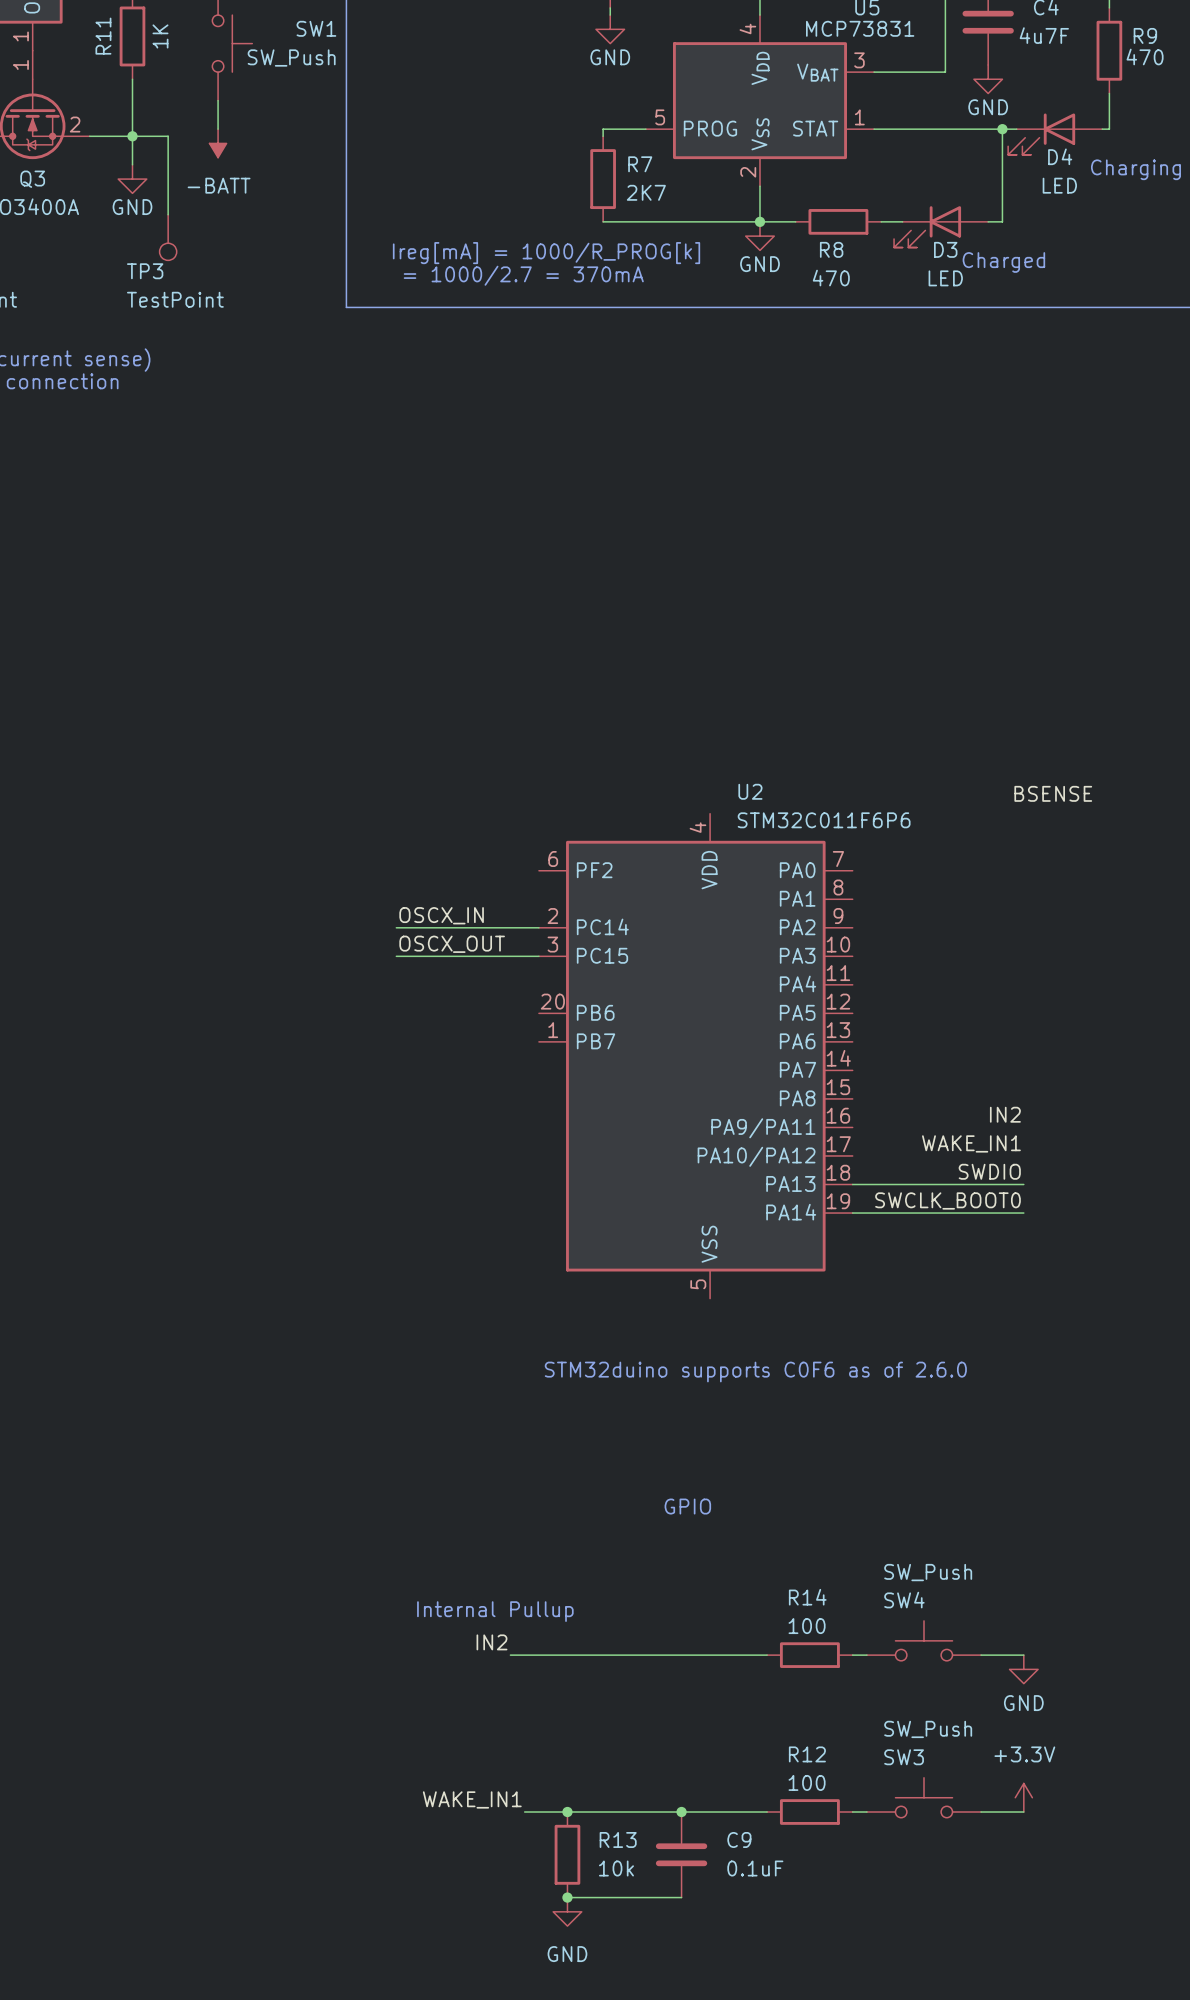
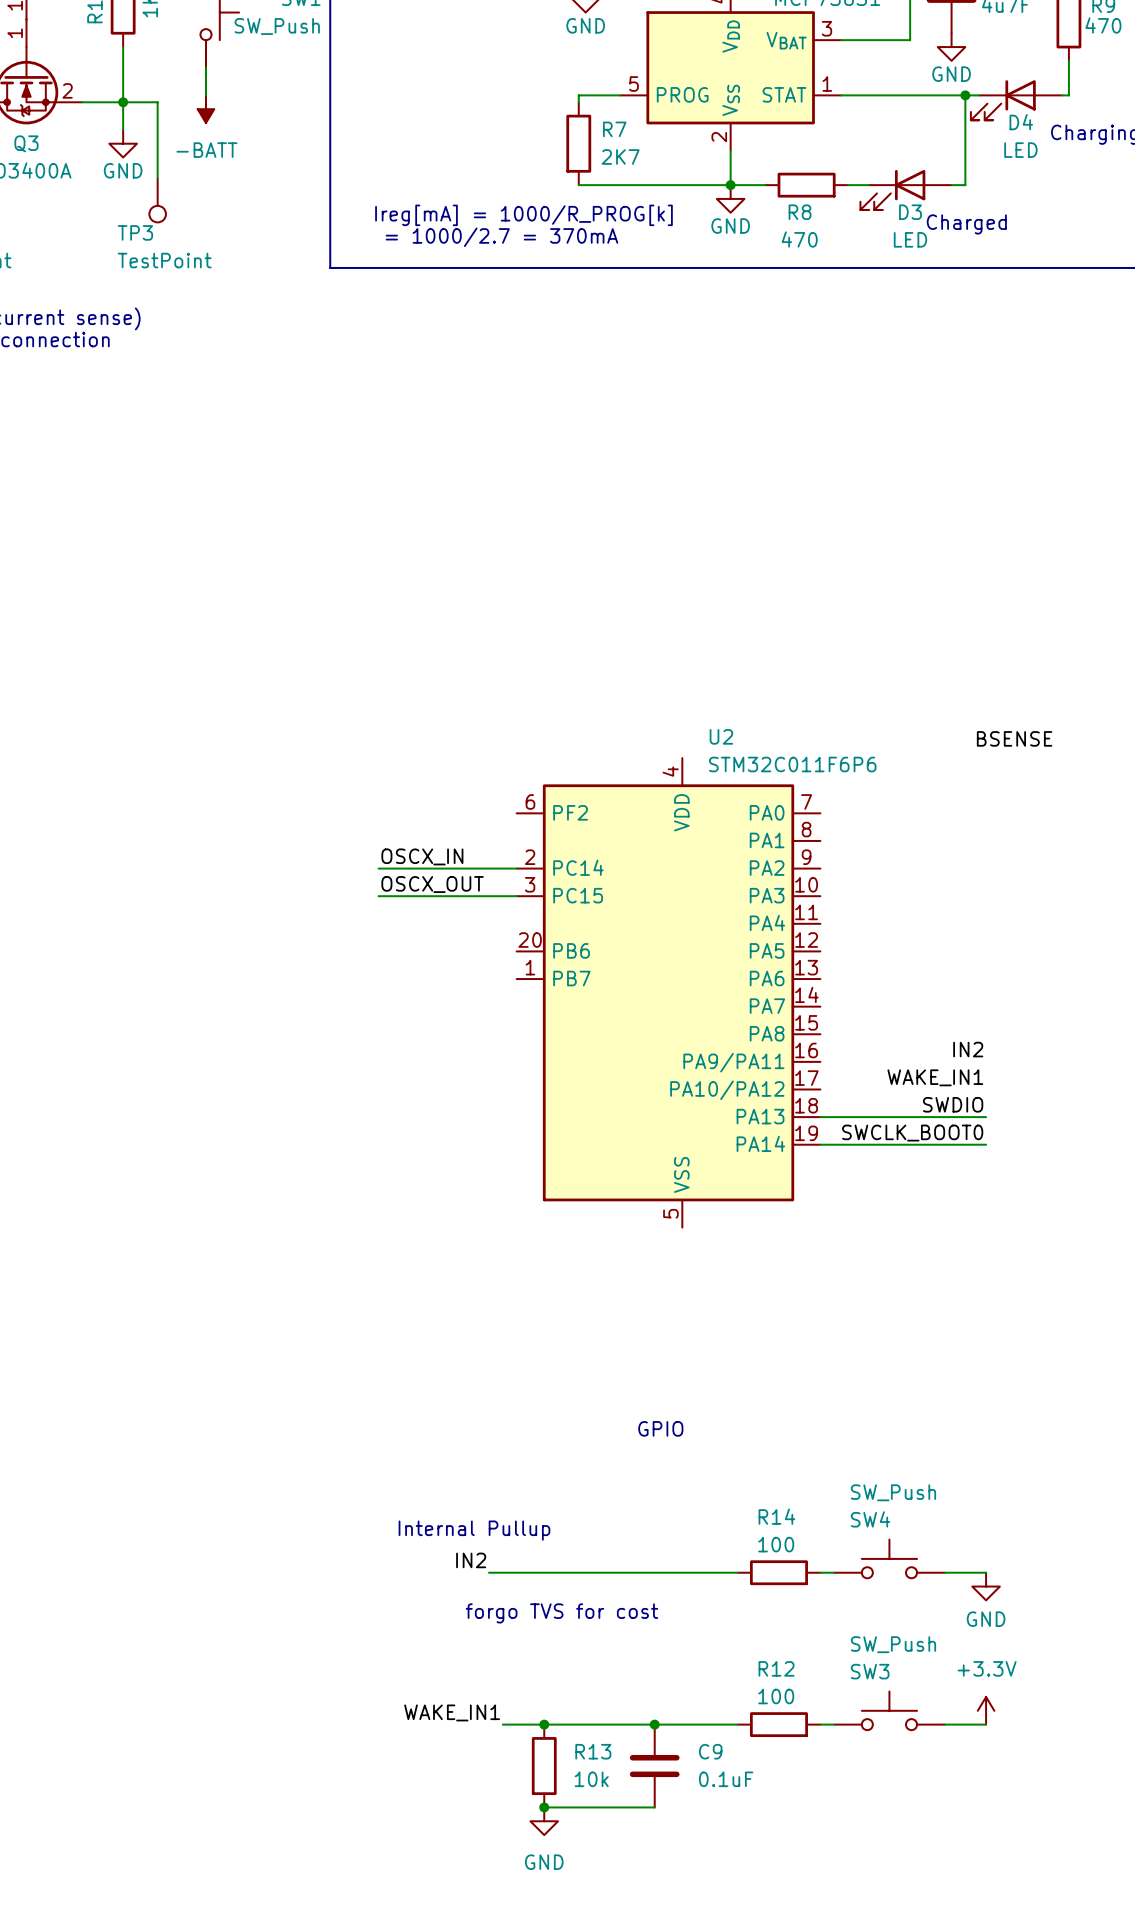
text: STM32duino supports C0F6 as of 2.6.0 (755, 1372) -> none
text: none -> forgo TVS for cost (561, 1613)

